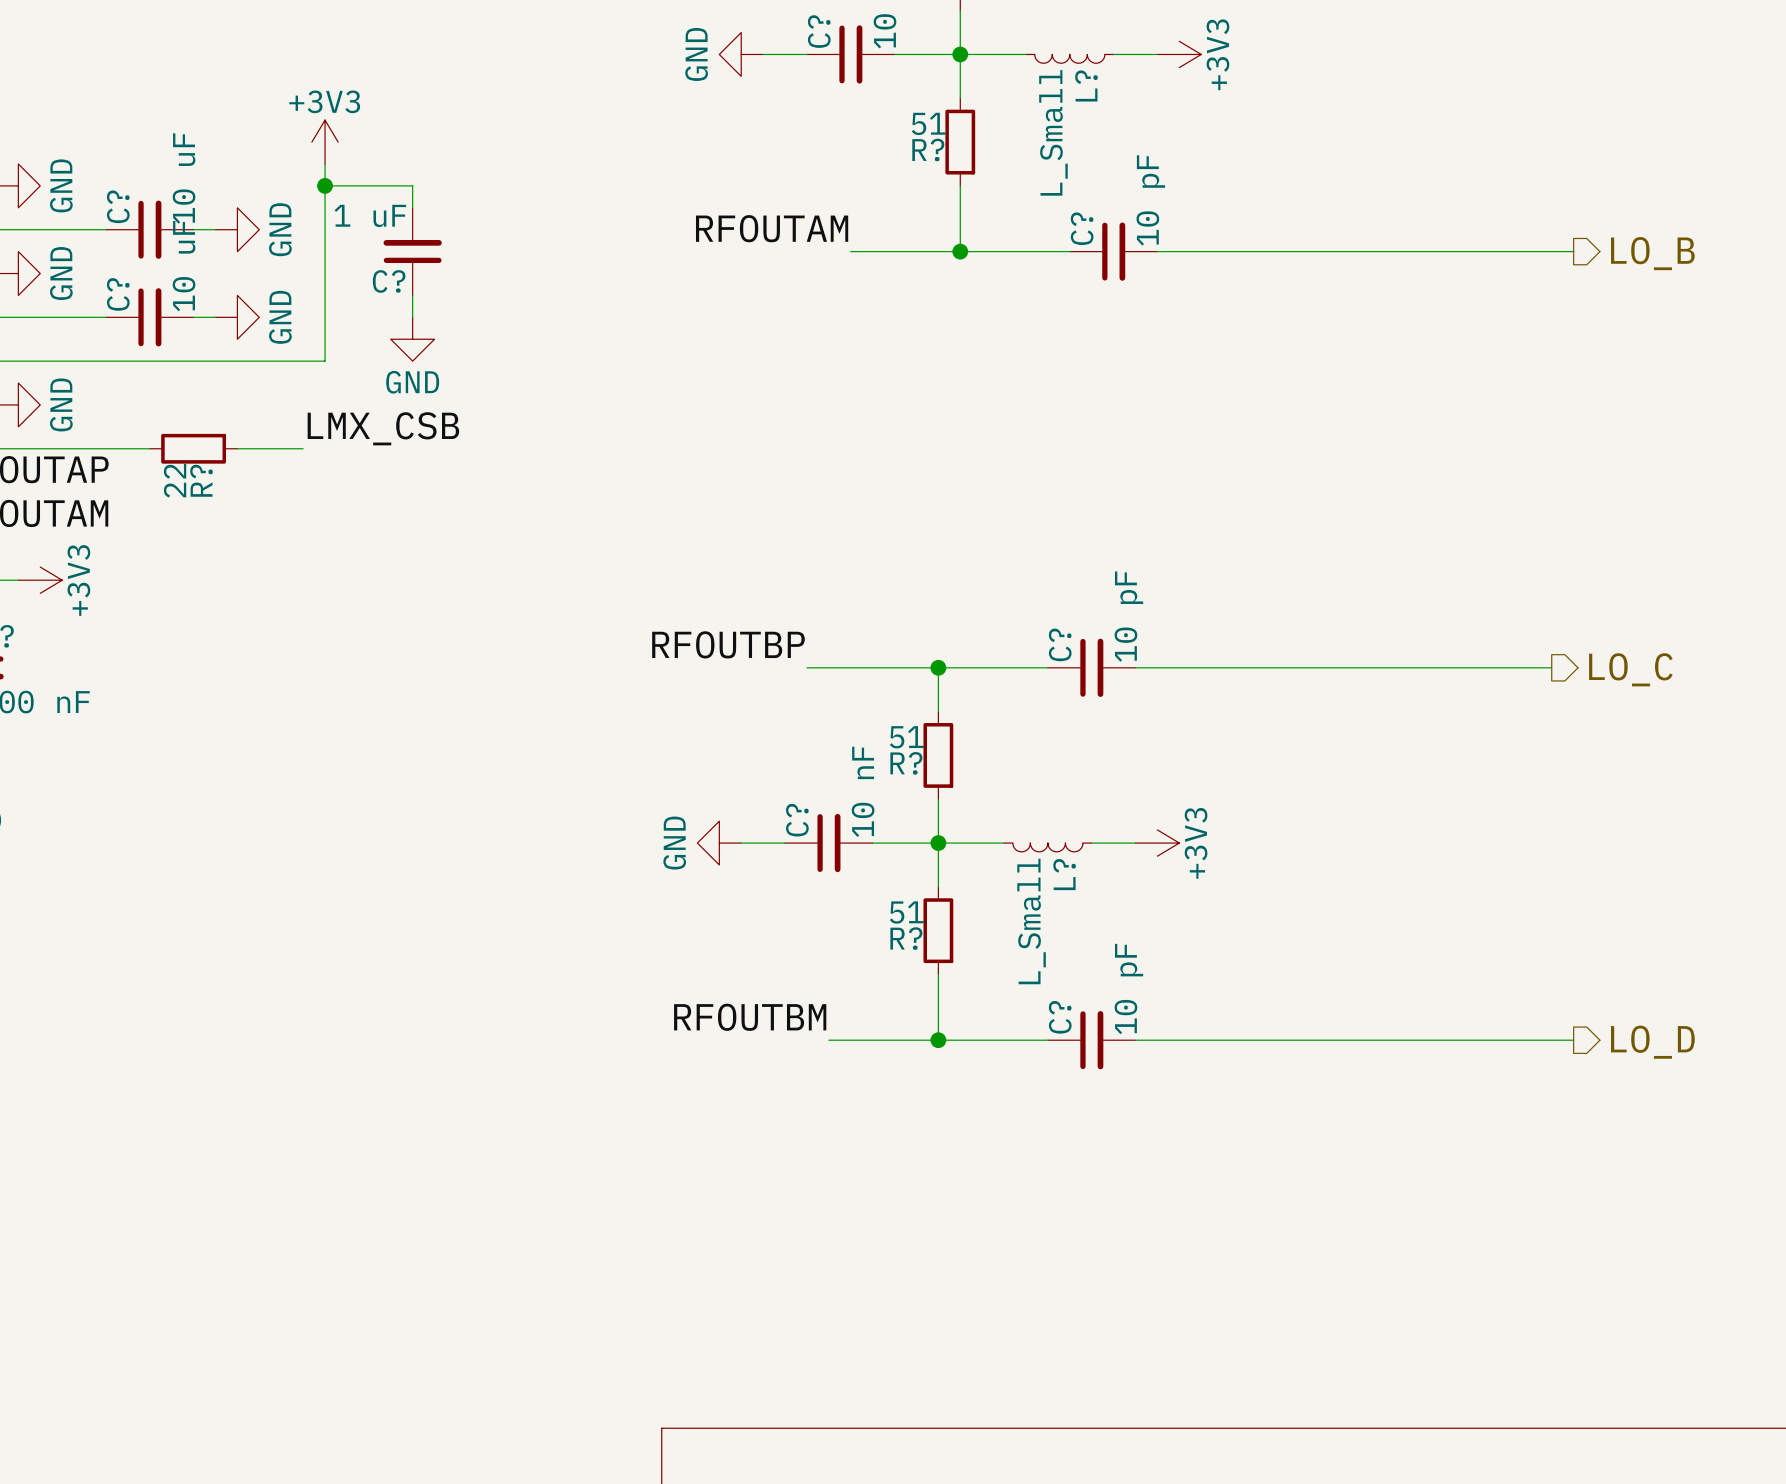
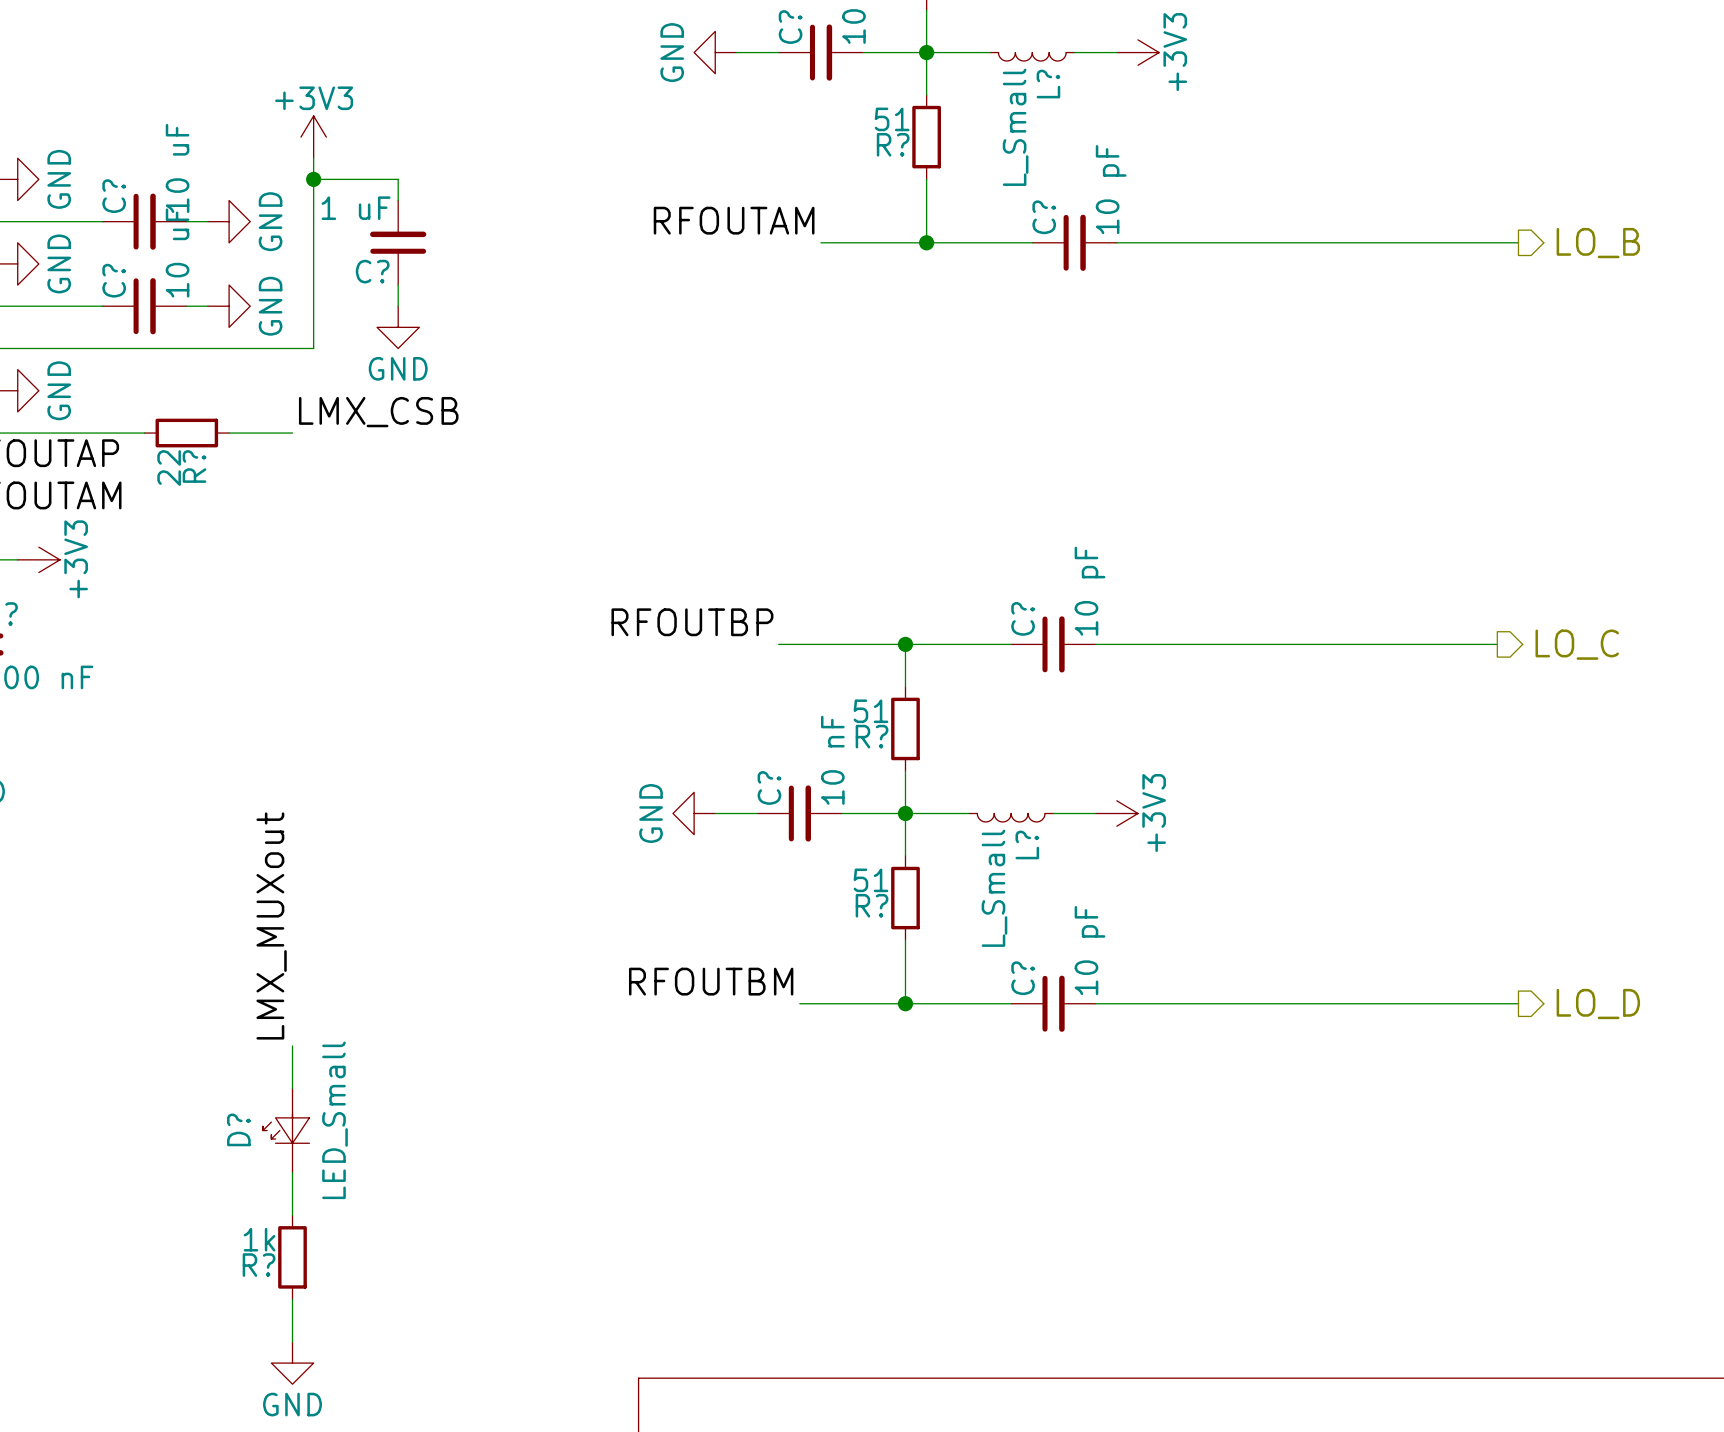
label: none -> LMX_MUXout (271, 925)
wire: none -> (292, 1046) (292, 1088)
D?: none -> LED_Small (286, 1130)
wire: none -> (292, 1172) (292, 1215)
R?: none -> 1k (292, 1257)
wire: none -> (292, 1299) (292, 1341)
power symbol: none -> GND (292, 1363)

